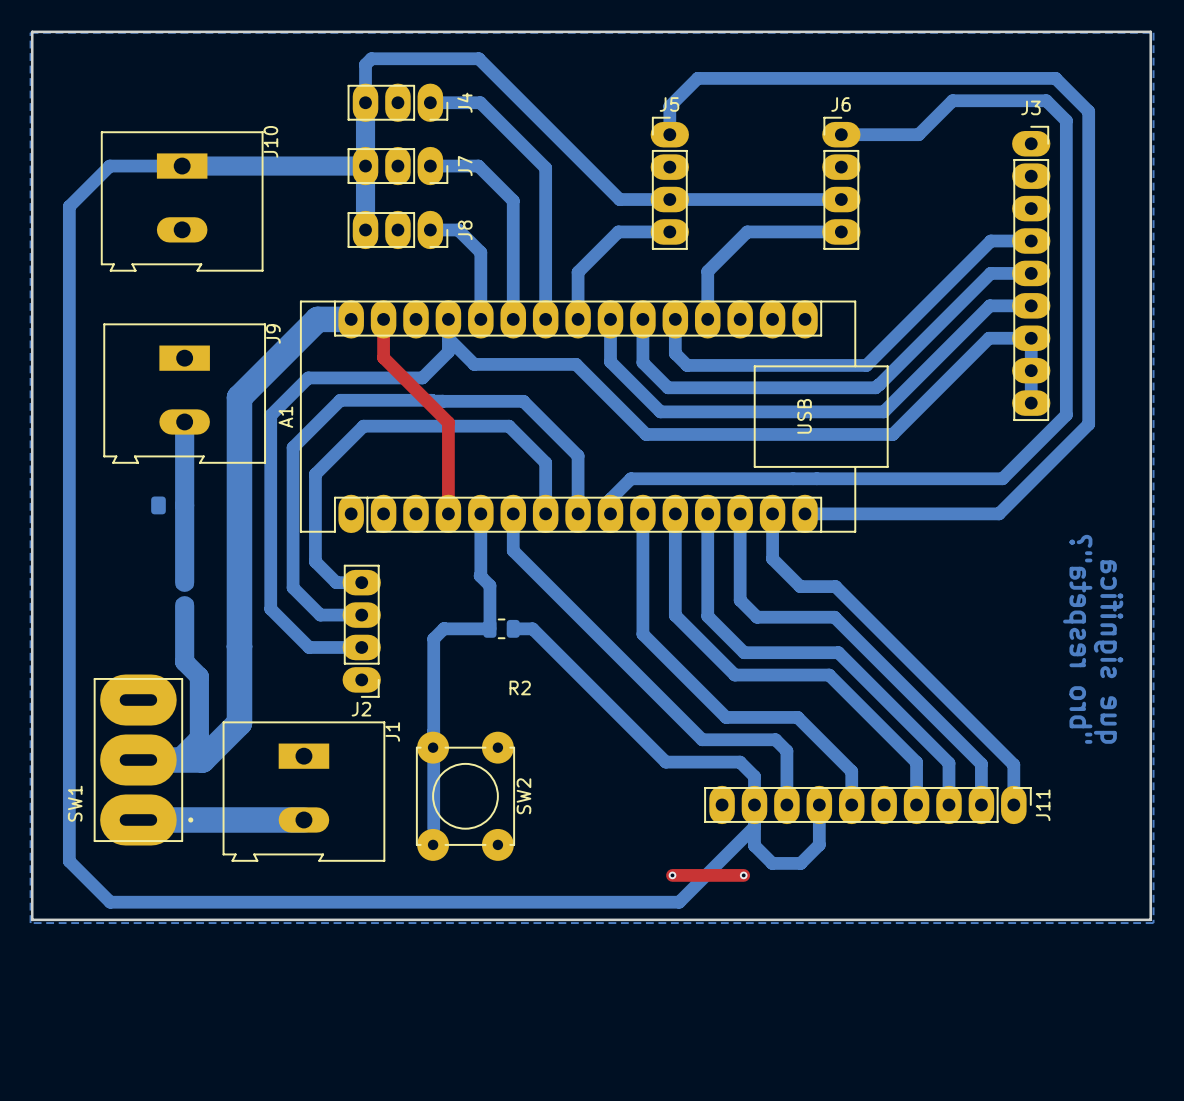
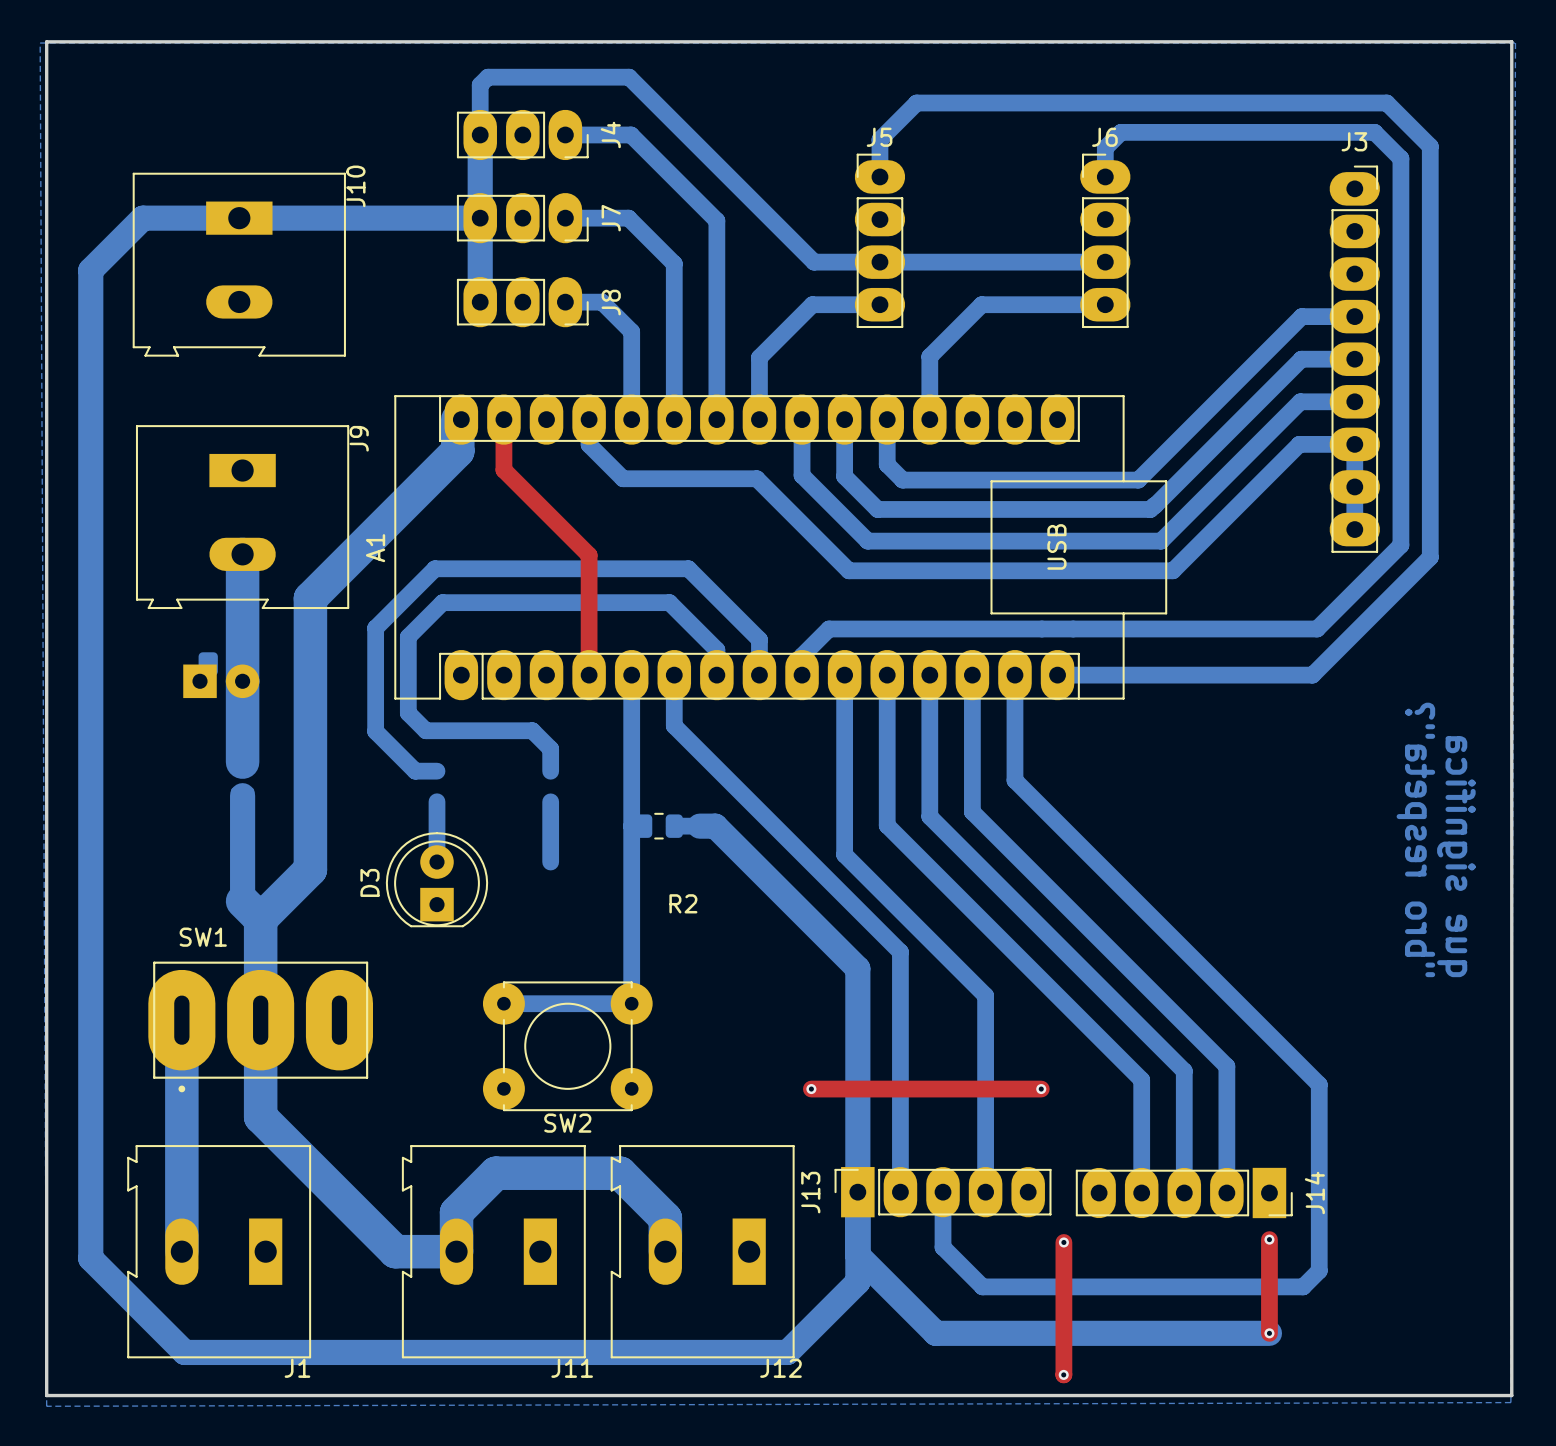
board edge: (35, 31) (32, 31) (32, 919) (1150, 919) -> (46, 41) (46, 1395) (1511, 1395) (1511, 1208)
bottom zone outline: (30, 32) (30, 923) (1153, 923) (1153, 32) -> (40, 43) (46, 1406) (1510, 1402) (1515, 43)
bottom track: (952, 100) (918, 134) (841, 134) -> (1251, 132) (1121, 132) (1105, 148) (1105, 176)
bottom track: (109, 166) (69, 206) (69, 861) (110, 902) (679, 902) (754, 826) -> (144, 218) (90, 270) (90, 1258) (184, 1352) (787, 1352) (857, 1282) (857, 968) (715, 826) (699, 826)
bottom track width: thin (109, 166) (182, 166) -> thick (144, 218) (239, 218)
bottom track: none -> (457, 419) (457, 451) (310, 598) (310, 869) (260, 919)
bottom track: (351, 319) (317, 319) (239, 397) (239, 723) (202, 760) (138, 760) (177, 760) (199, 737) (199, 676) (184, 661) -> (260, 919) (242, 901) (242, 869)
bottom track: (448, 338) (448, 352) (422, 377) (308, 377) (270, 415) (270, 609) (309, 647) (361, 647) -> none
bottom track: (442, 401) (523, 401) (578, 455) (578, 486) -> (437, 771) (415, 771) (375, 731) (375, 628) (434, 568) (688, 568) (759, 639)
bottom track: (442, 401) (340, 400) (293, 447) (293, 587) (320, 615) (361, 615) -> none
bottom track width: thin (184, 421) (184, 580) -> thick (242, 554) (242, 762)
bottom track: (545, 494) (545, 462) (509, 426) (363, 426) (315, 474) (315, 561) (336, 582) (361, 582) -> (716, 649) (669, 602) (442, 602) (408, 636) (408, 713) (425, 730) (532, 730) (550, 749) (550, 771)
part: none -> (221, 681)
bottom track: (513, 550) (702, 739) (775, 739) (786, 751) (786, 804) -> (674, 723) (674, 725) (900, 952) (900, 1192)
bottom track: (772, 558) (800, 586) (835, 586) (1013, 764) (1013, 804) -> (1014, 734) (1014, 780) (1319, 1084) (1319, 1270) (1303, 1286) (982, 1286) (943, 1247) (943, 1192)
bottom track: (480, 575) (489, 585) (489, 628) (444, 628) (433, 638) (433, 828) -> (631, 755) (631, 1003) (503, 1003)
bottom track: (740, 600) (757, 617) (834, 617) (981, 764) (981, 804) -> (972, 788) (972, 811) (1226, 1066) (1226, 1193)
bottom track: none -> (437, 801) (437, 862)
bottom track: none -> (550, 801) (550, 862)
bottom track: (675, 615) (734, 675) (829, 675) (916, 762) (916, 804) -> (887, 808) (887, 825) (1141, 1079) (1141, 1193)
bottom track: (707, 616) (744, 652) (838, 652) (948, 763) (948, 804) -> (929, 809) (929, 816) (1184, 1071) (1184, 1193)
bottom track: (532, 628) (665, 762) (740, 762) (754, 776) (754, 845) (772, 863) (800, 863) (819, 844) (819, 804) -> none
J2: (361, 631) -> none
bottom track: (642, 634) (726, 717) (797, 717) (851, 771) (851, 804) -> (844, 833) (844, 854) (985, 995) (985, 1192)
D3: none -> (437, 879)
bottom track: none -> (260, 919) (260, 1116) (395, 1251) (456, 1251) (456, 1212) (495, 1173) (620, 1173) (665, 1218) (665, 1251)
SW1 rotation: 0° (143, 760) -> 90° clockwise (260, 1026)
bottom track: none -> (181, 1020) (181, 1251)
J11 footprint: [704, 785, 1032, 825] -> [401, 1145, 586, 1359]
J1 rotation: 0° (303, 791) -> 90° clockwise (219, 1251)
J1 position: (303, 791) -> (219, 1251)
SW2 rotation: 0° (465, 796) -> 90° clockwise (567, 1046)
J11 name position: J11 (1043, 805) -> J11 (572, 1368)
bottom track: (138, 819) (303, 819) -> none
top track: none -> (811, 1089) (1041, 1089)
via: none -> (811, 1089)
via: none -> (1041, 1089)
top track: (672, 875) (743, 875) -> none
via: (672, 875) -> none
via: (743, 875) -> none
J13: none -> (943, 1192)
J14: none -> (1184, 1193)
top track: none -> (1269, 1239) (1269, 1333)
via: none -> (1269, 1239)
top track: none -> (1063, 1242) (1063, 1374)
via: none -> (1063, 1242)
J12: none -> (702, 1251)
bottom track: none -> (857, 1255) (935, 1333) (1269, 1333)
via: none -> (1269, 1333)
via: none -> (1063, 1374)

